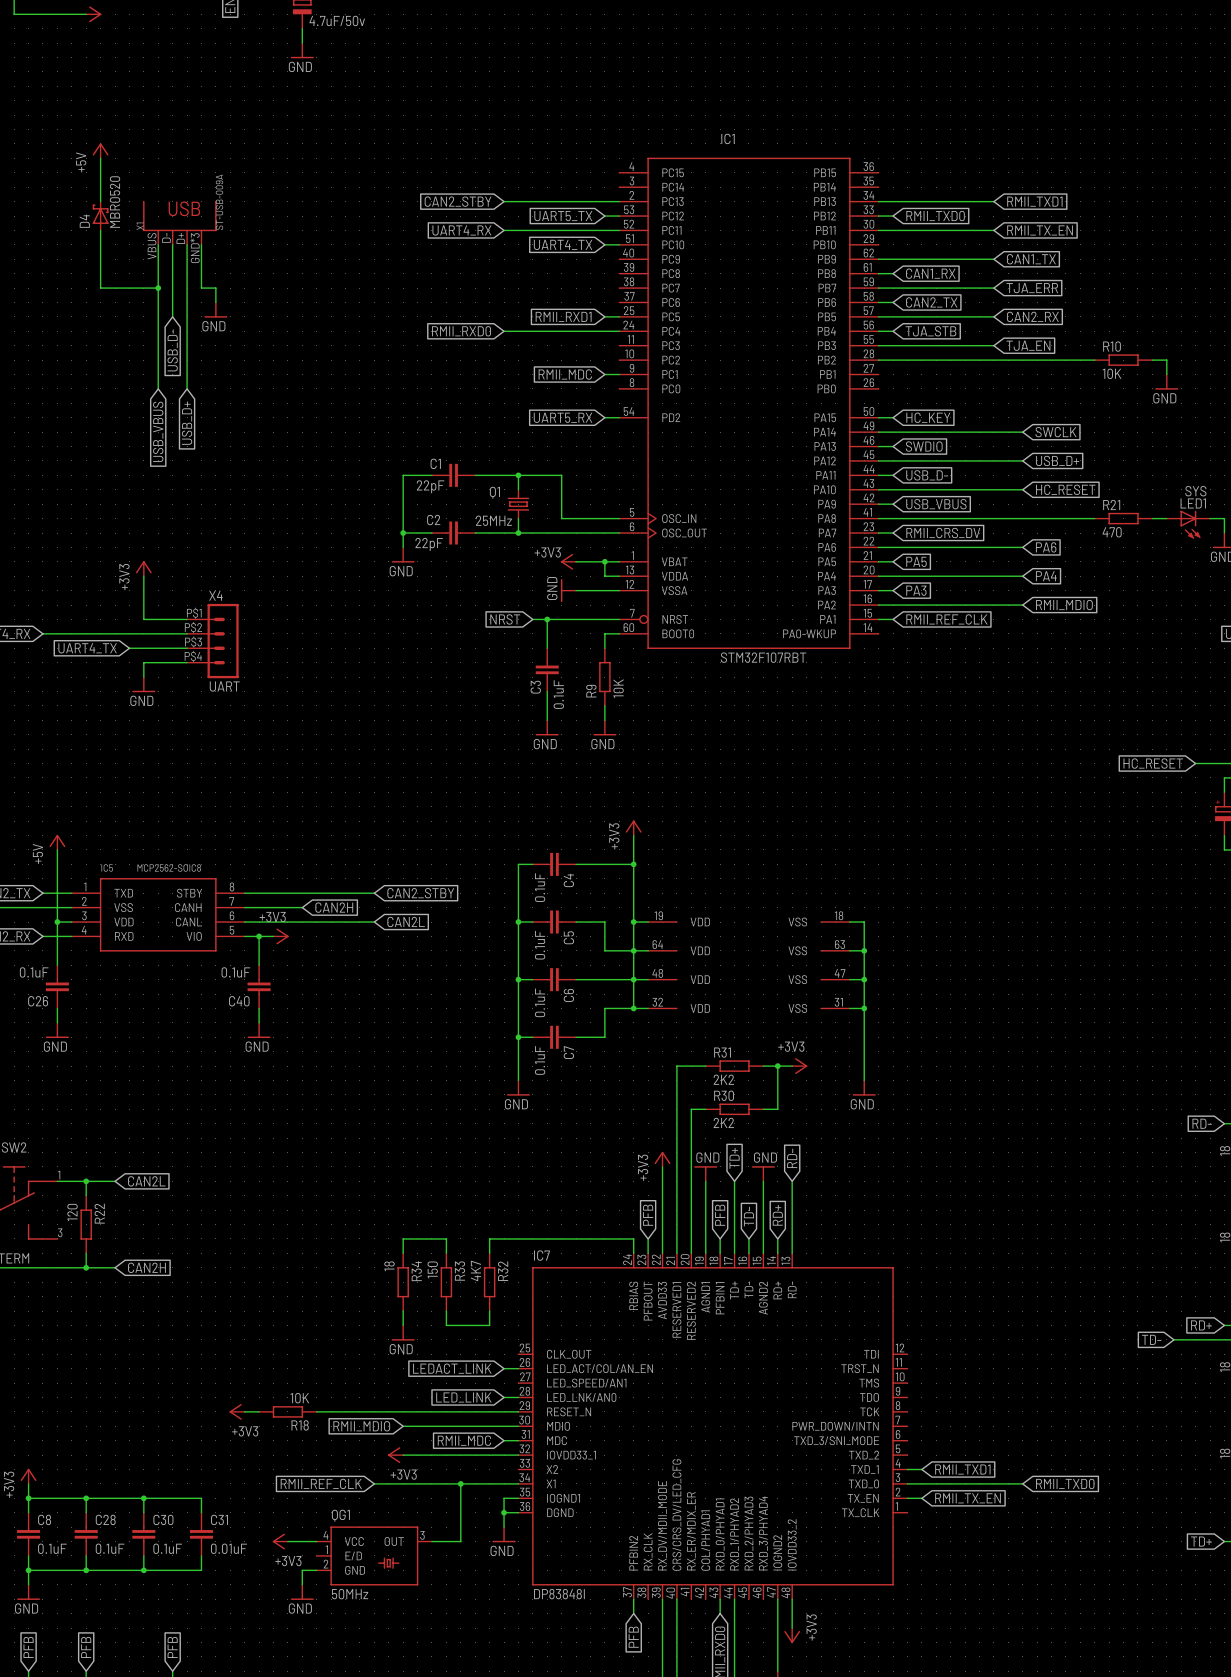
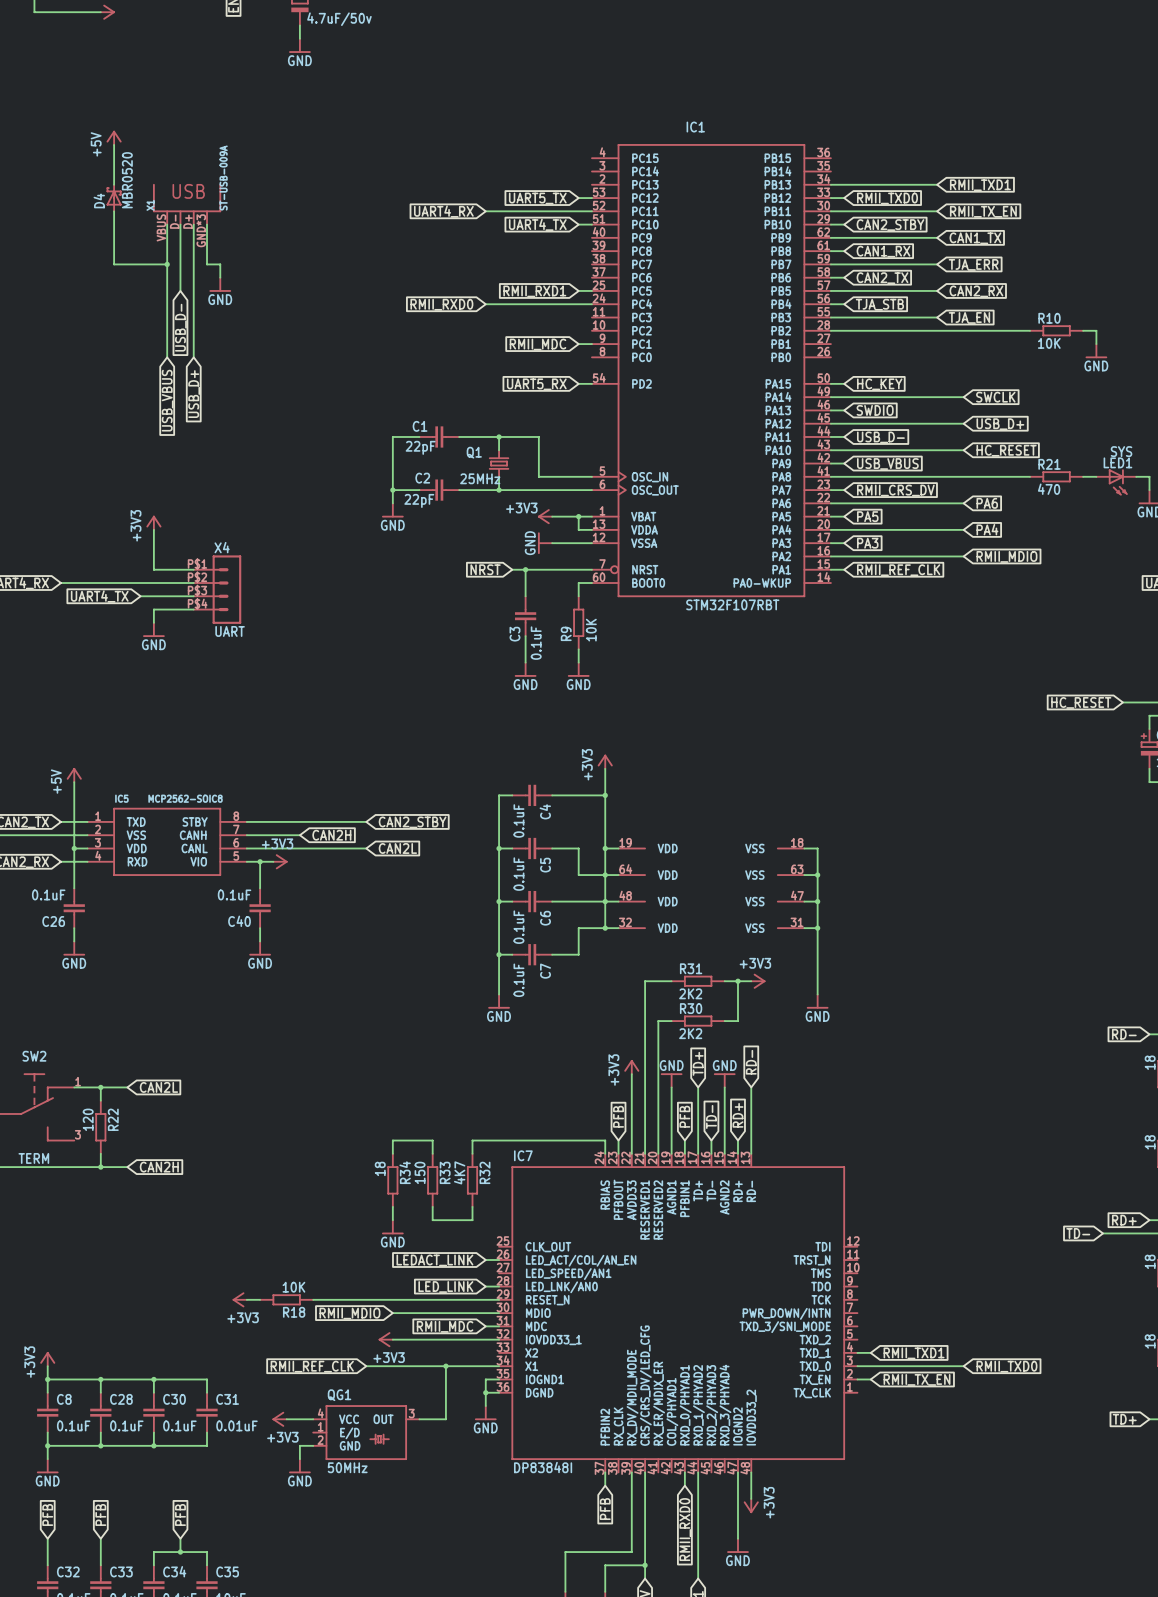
global label: CAN2_STBY (458, 201) -> none
wire: (504, 201) (619, 201) -> none
wire: none -> (830, 224) (844, 224)
global label: none -> CAN2_STBY (890, 225)

